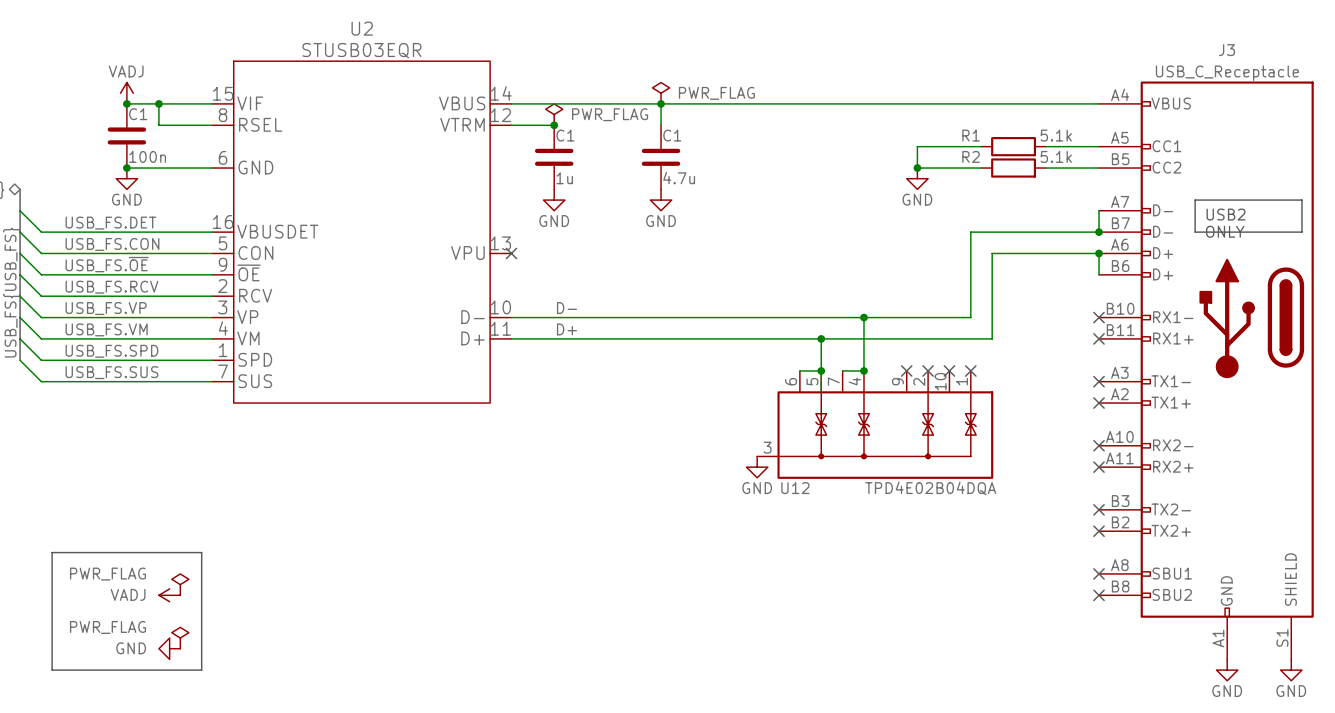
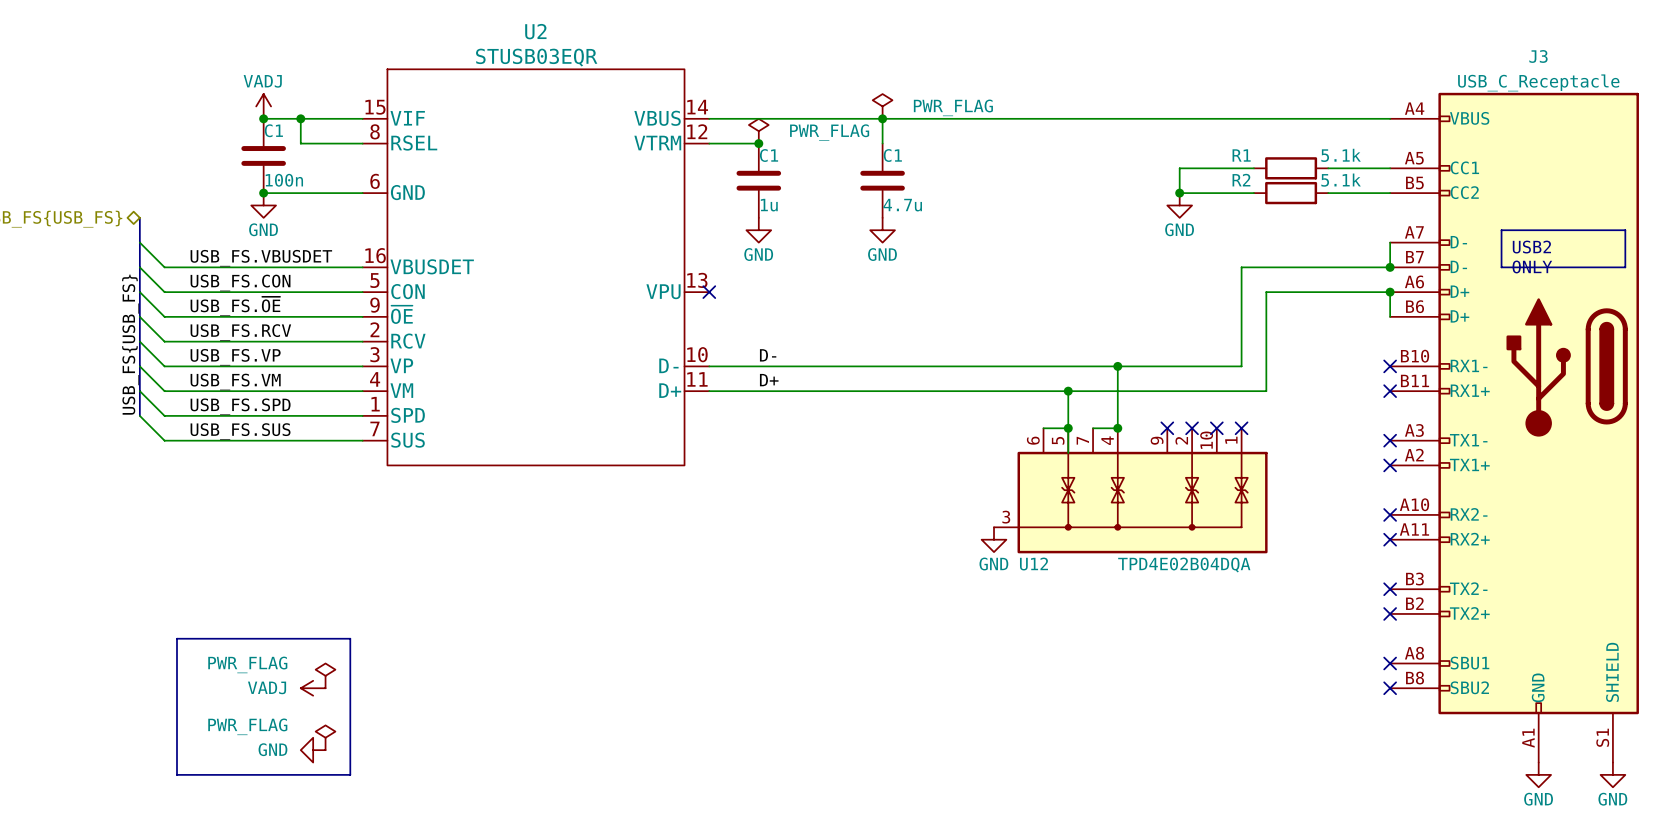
label: USB_FS.DET (110, 223) -> USB_FS.VBUSDET (261, 258)

